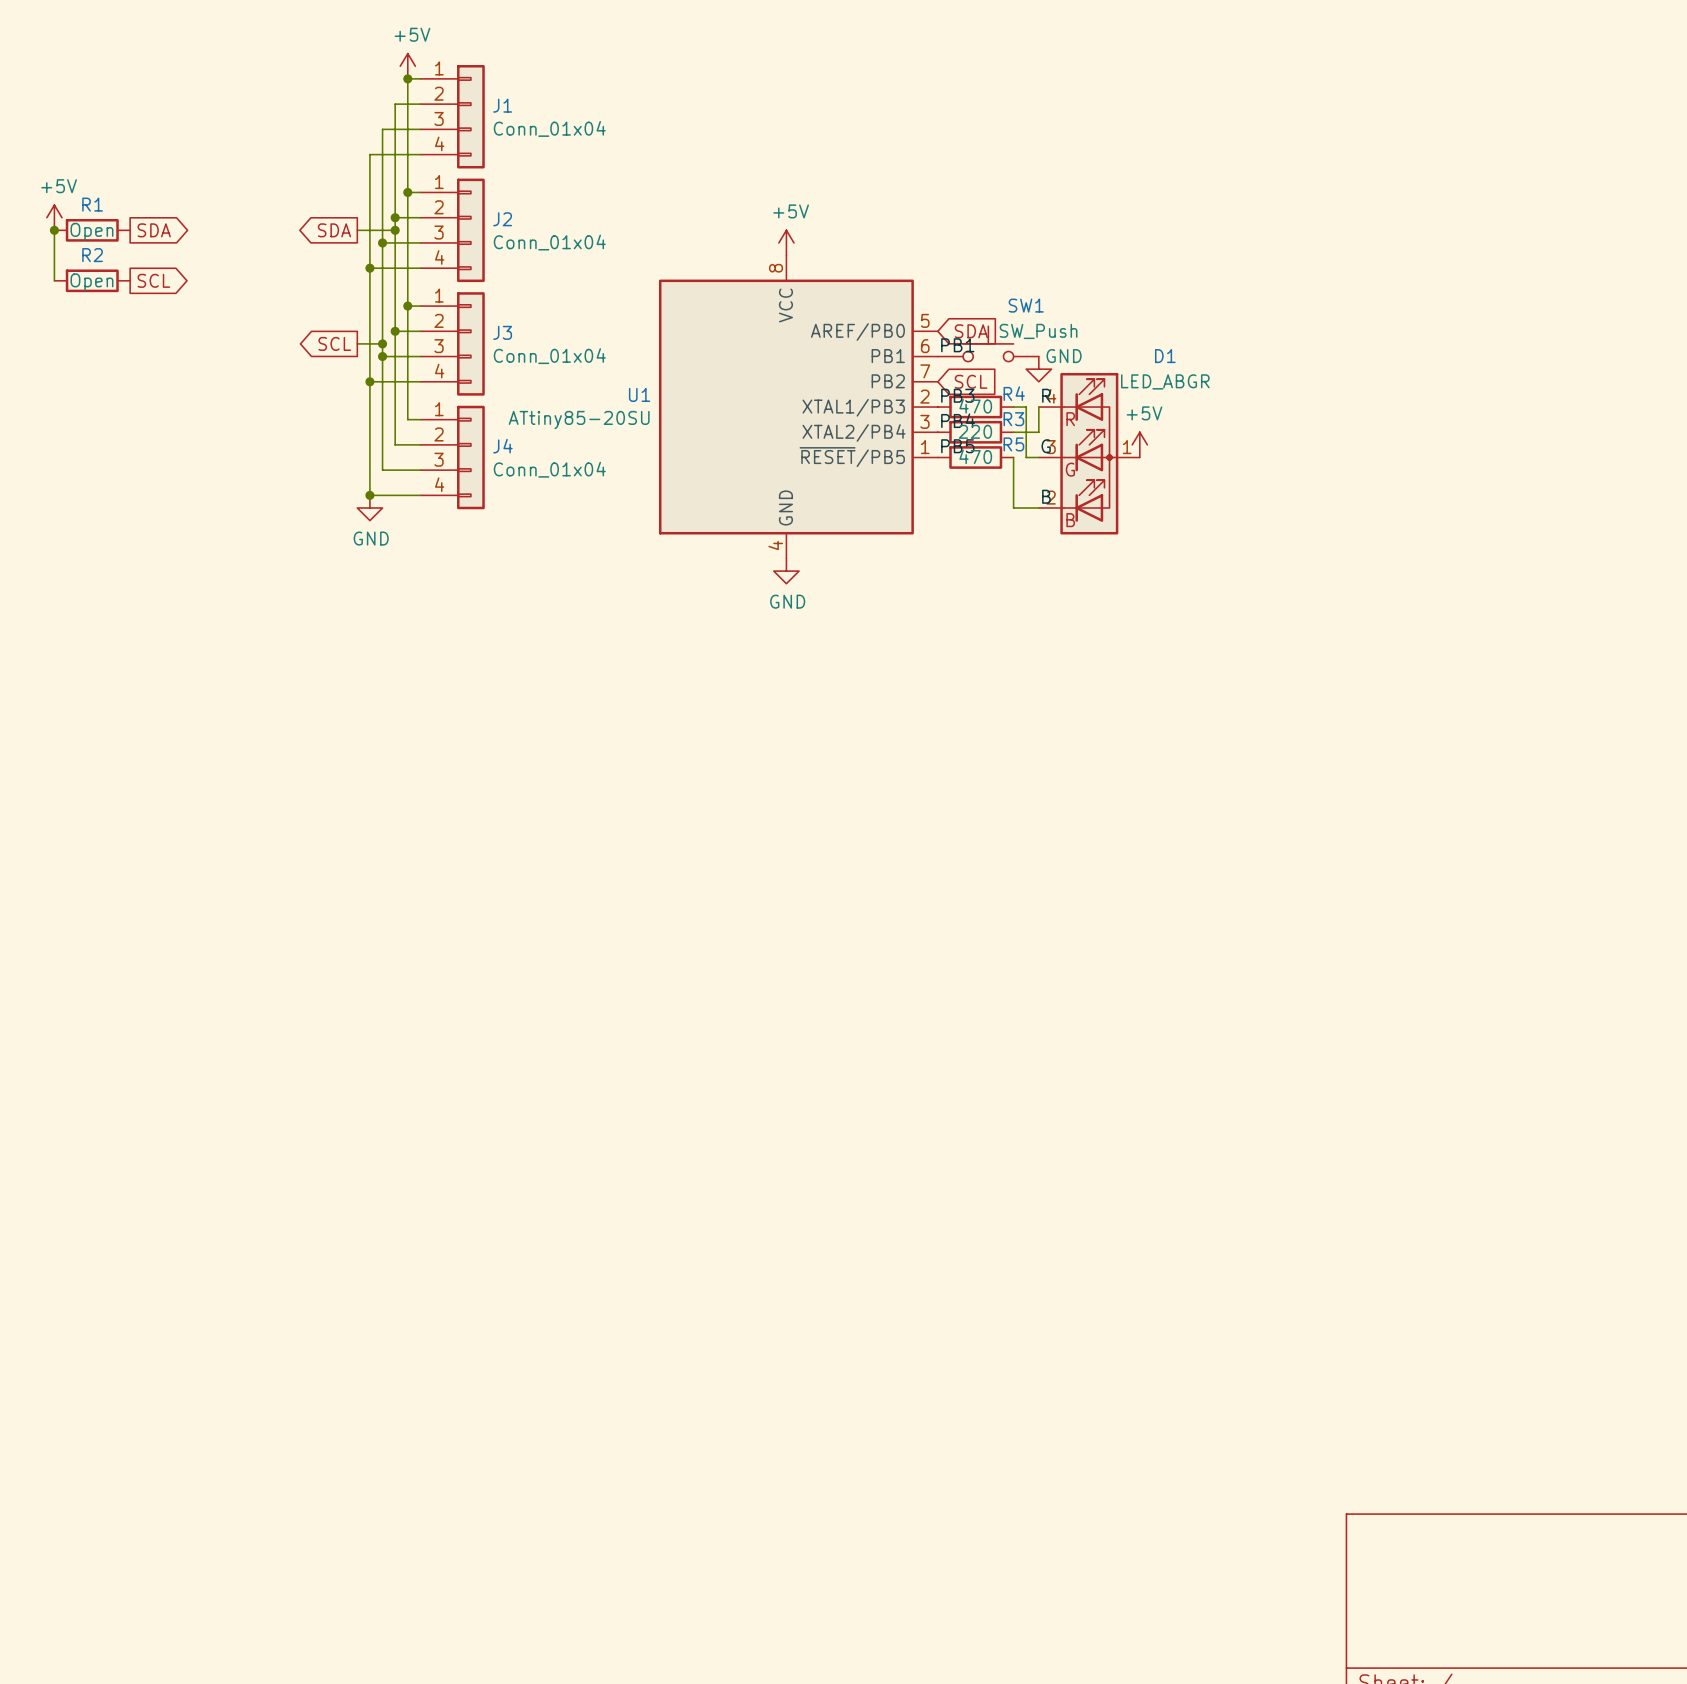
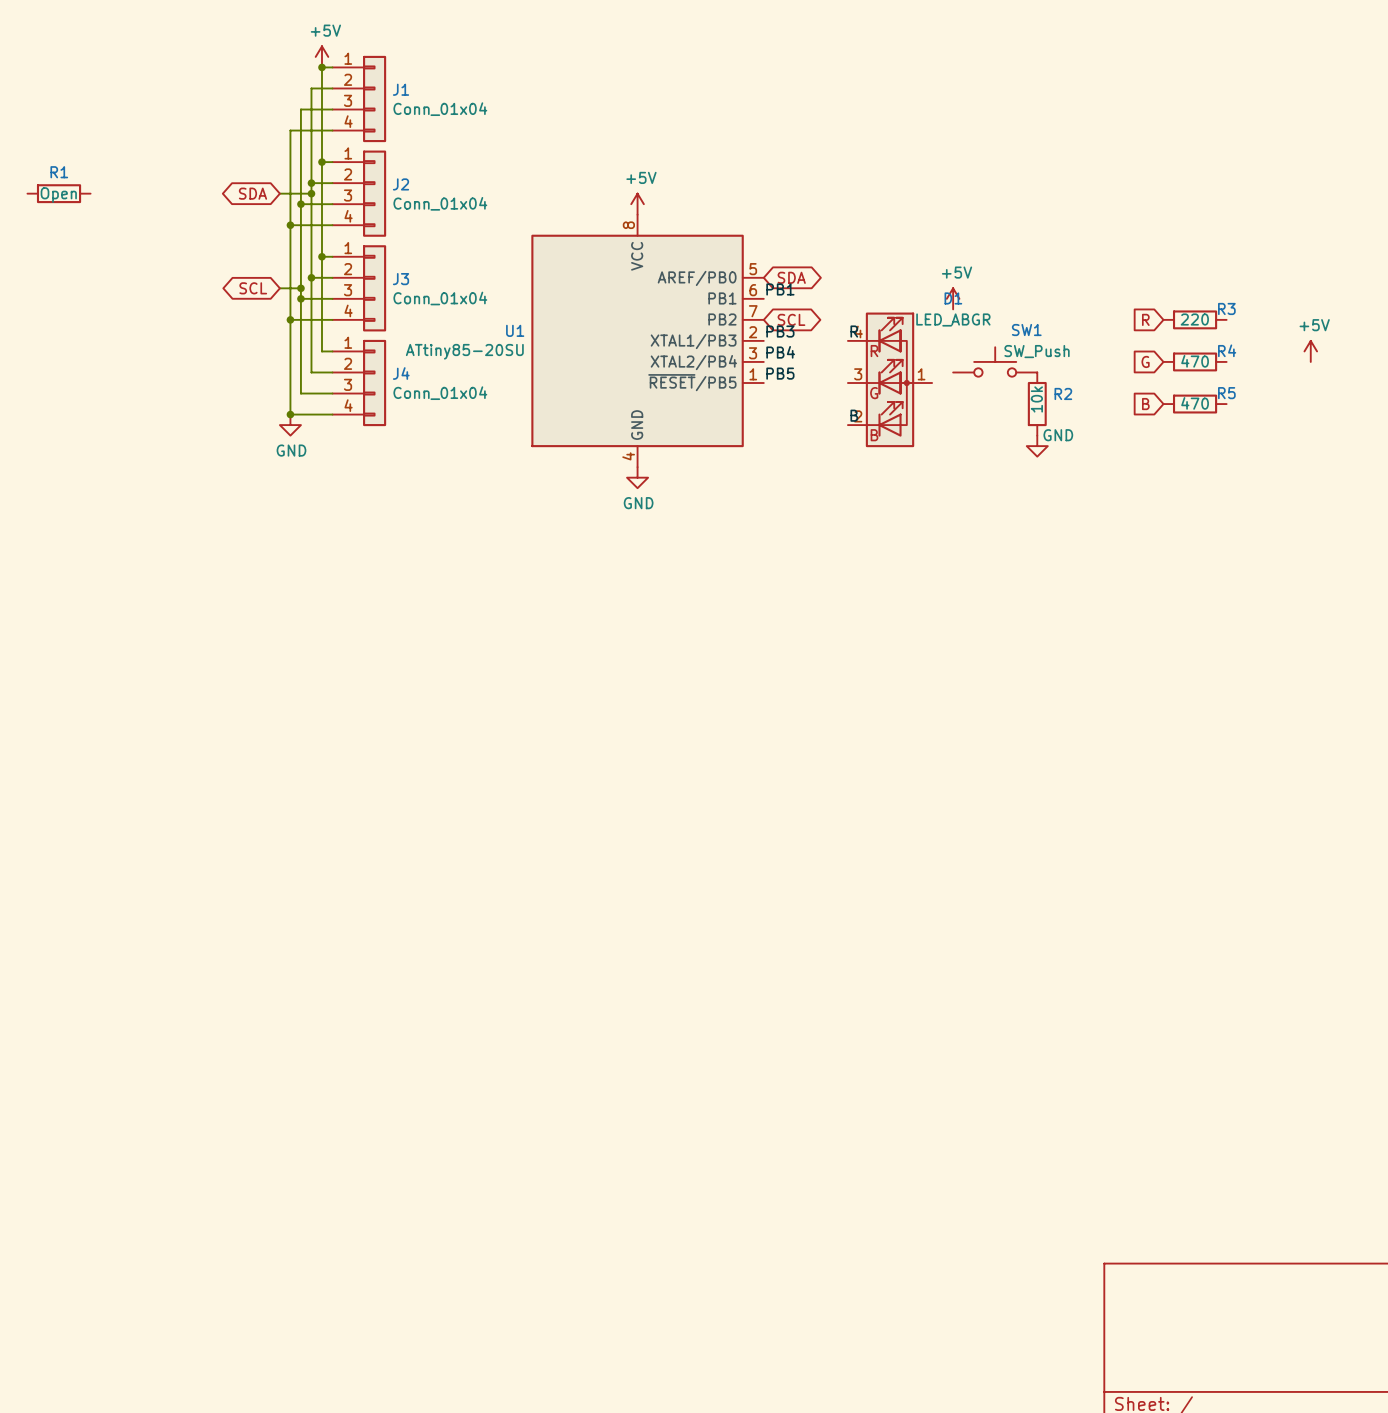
power symbol: +5V (54, 217) -> none
wire: (54, 230) (54, 280) -> none
junction: (54, 230) -> none
global label: SDA (154, 230) -> none
global label shape: output (334, 230) -> bidirectional (252, 193)
R2 rotation: 0° (92, 280) -> 90° clockwise (1037, 404)
R2 position: (92, 280) -> (1037, 404)
global label: SCL (153, 280) -> none
R2 value: Open (91, 282) -> 10k (1036, 399)
global label shape: input (971, 331) -> bidirectional (791, 277)
global label shape: output (334, 343) -> bidirectional (253, 288)
SW1 position: (988, 343) -> (995, 361)
power symbol: GND (1038, 369) -> none
global label shape: input (971, 381) -> bidirectional (791, 319)
global label: none -> R (1145, 319)
R4 position: (975, 407) -> (1195, 361)
wire: (1013, 407) (1026, 407) (1026, 457) (1038, 457) -> none
wire: (1038, 407) (1038, 432) (1013, 432) -> none
power symbol: none -> +5V (1310, 351)
R3 position: (975, 432) -> (1195, 319)
global label: none -> G (1145, 361)
power symbol position: +5V (1139, 444) -> +5V (953, 298)
label: G (1046, 446) -> none
R5 position: (975, 457) -> (1195, 404)
wire: (1013, 457) (1013, 507) (1038, 507) -> none
global label: none -> B (1145, 404)
power symbol: none -> GND (1037, 446)

